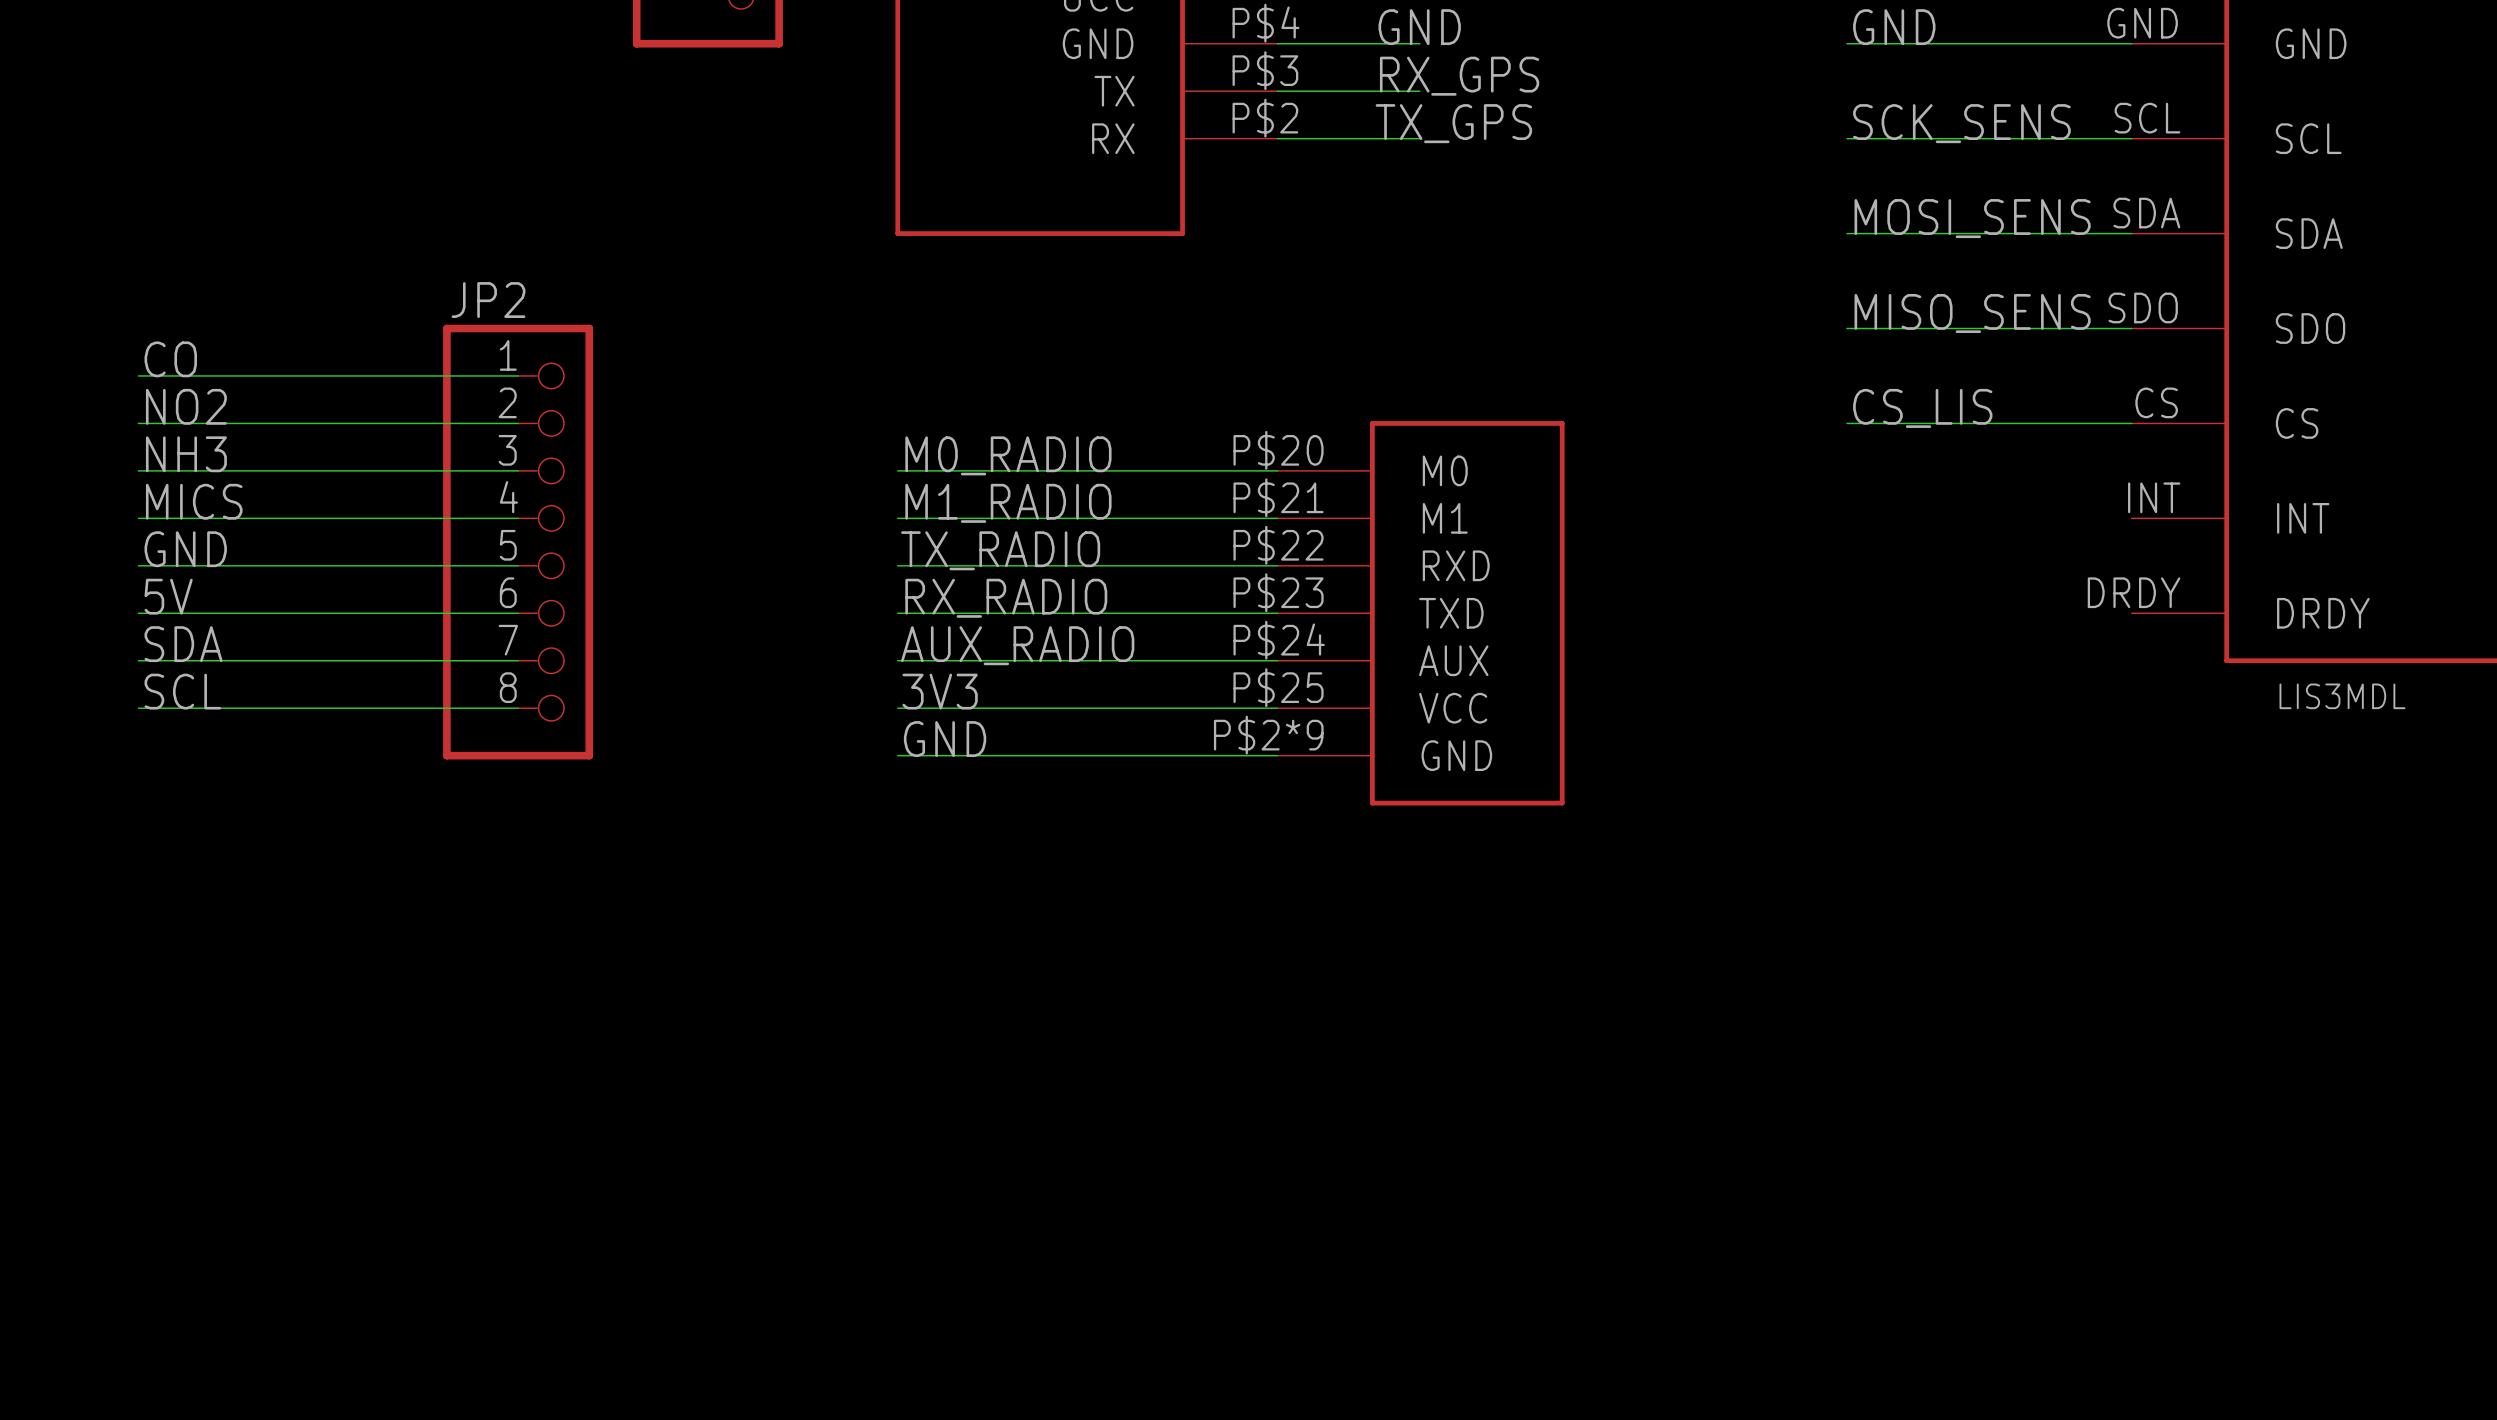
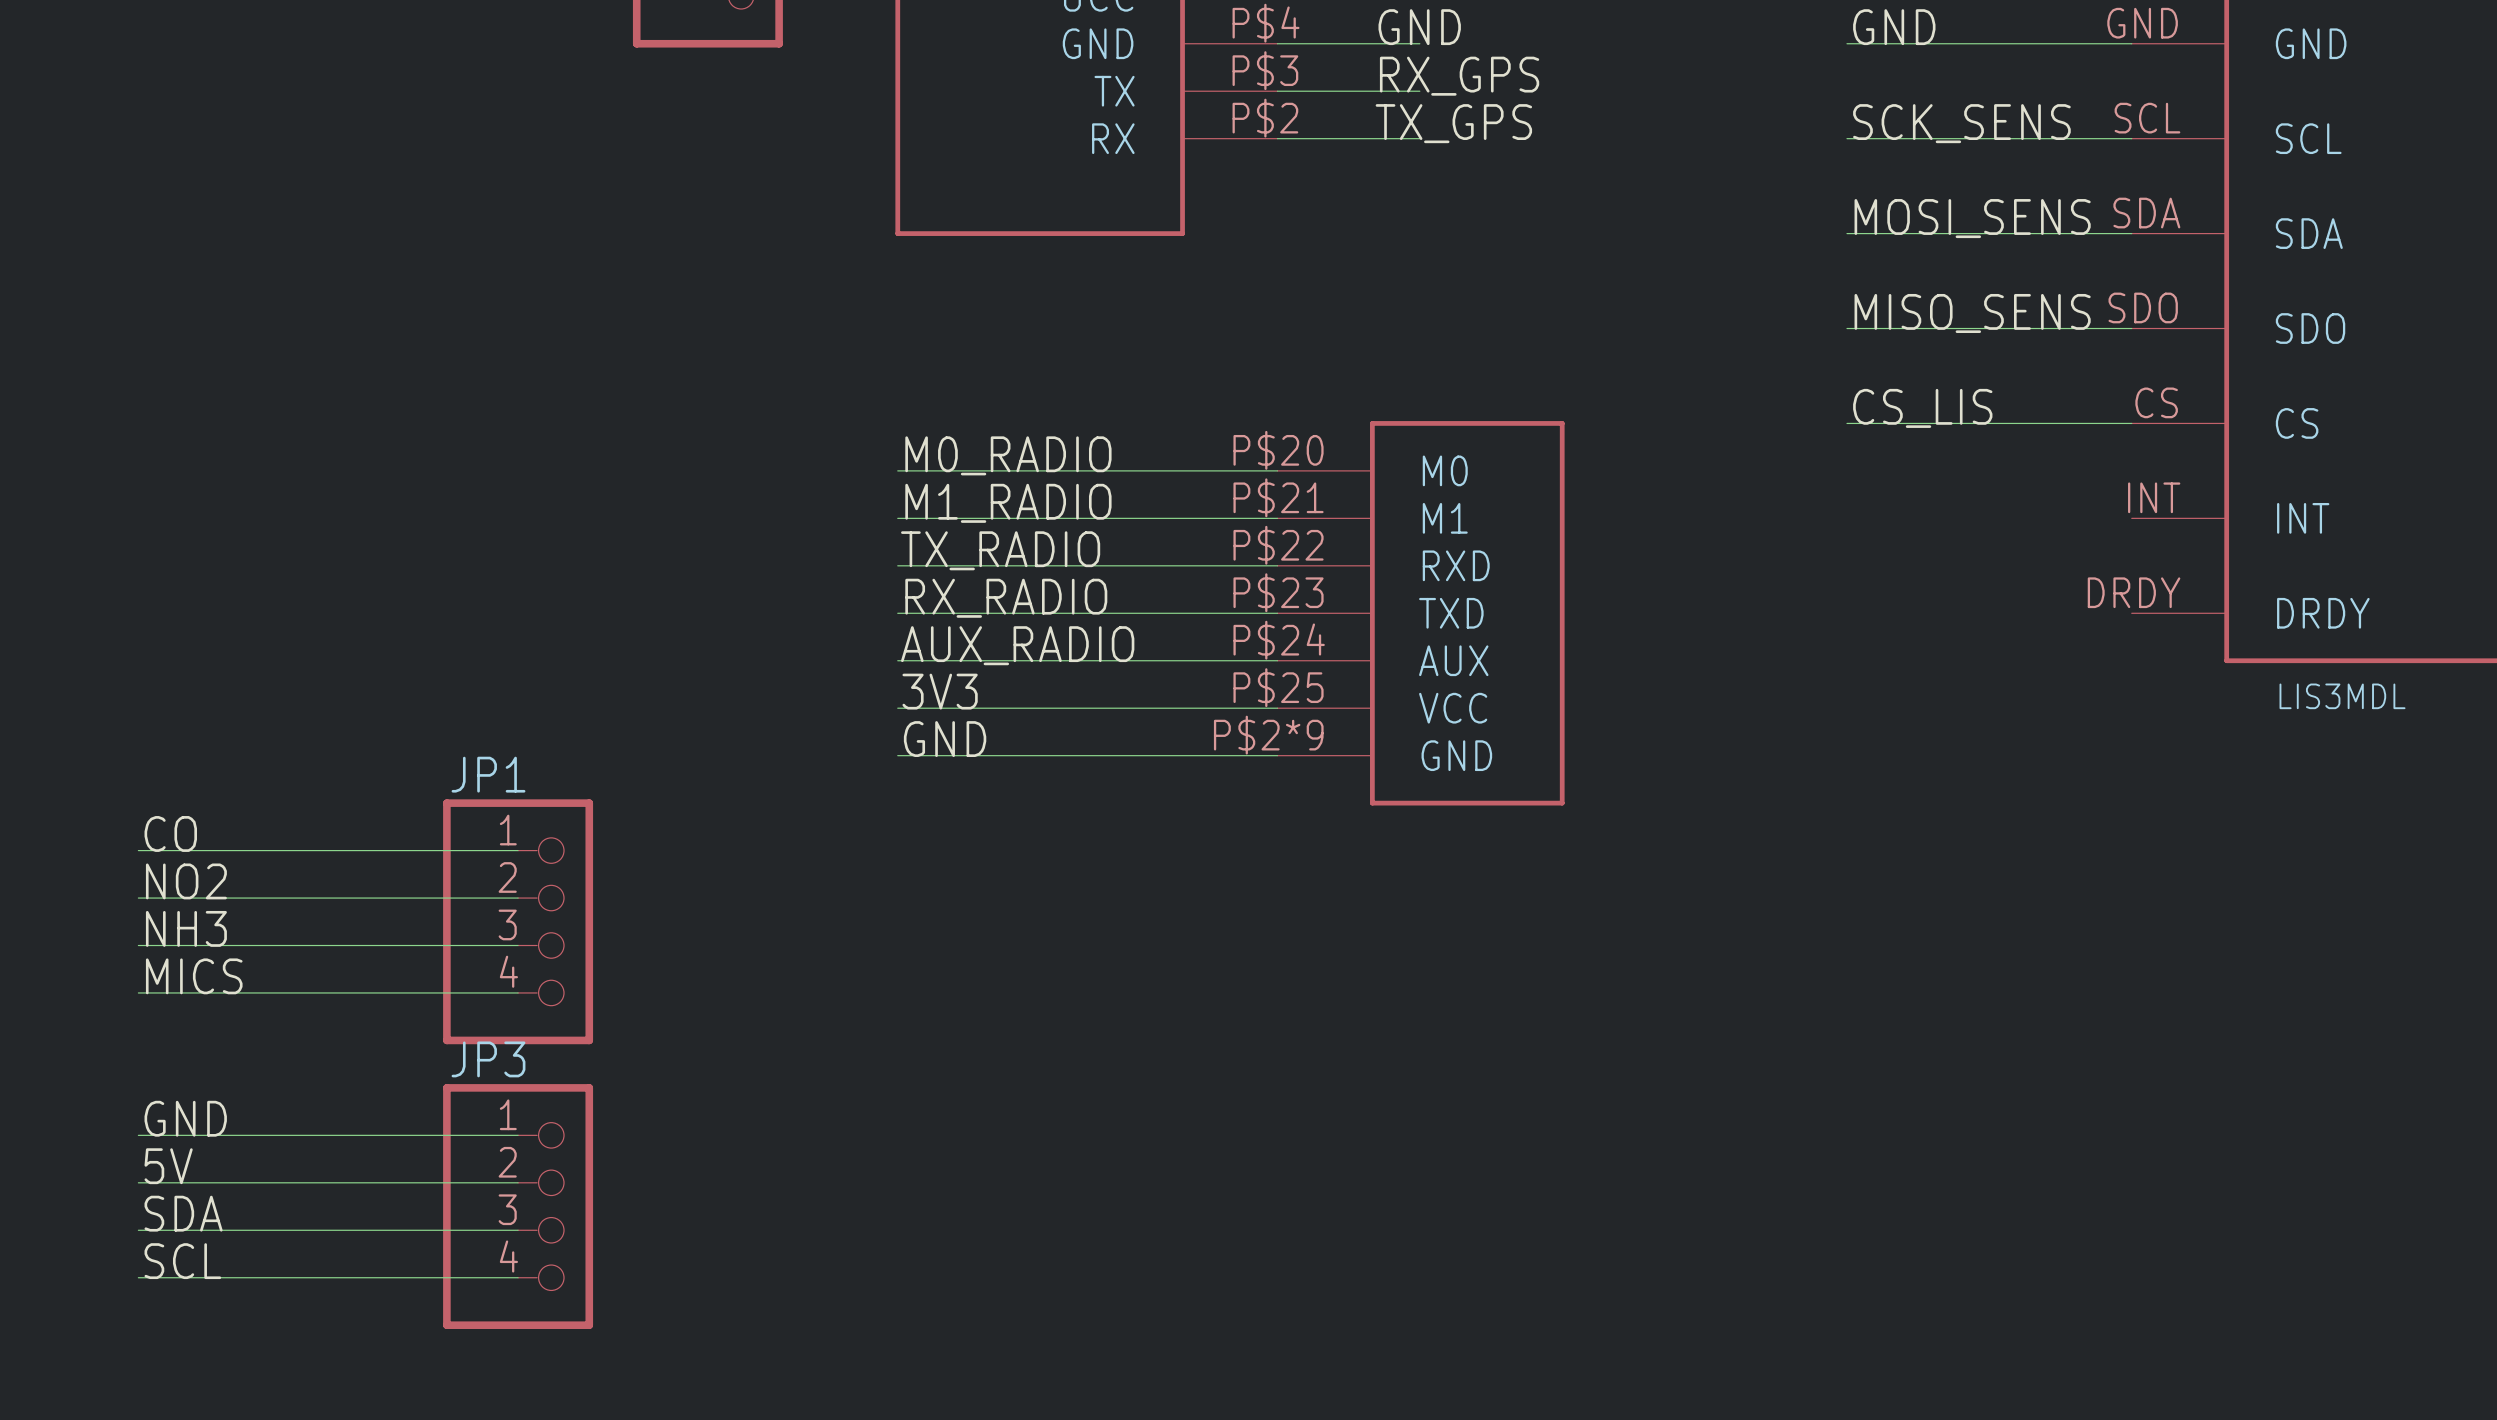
label: CO (170, 359) -> none
wire: (138, 375) (518, 375) -> none
label: NO2 (186, 406) -> none
wire: (138, 423) (518, 423) -> (138, 850) (518, 850)
label: NH3 (186, 454) -> none
wire: (138, 470) (518, 470) -> (138, 898) (518, 898)
label: MICS (194, 501) -> none
wire: (138, 518) (518, 518) -> (138, 945) (518, 945)
JP2: (518, 542) -> none
label: GND (185, 549) -> none
wire: (138, 565) (518, 565) -> (138, 992) (518, 992)
label: 5V (168, 596) -> none
wire: (138, 613) (518, 613) -> none
label: SDA (183, 644) -> none
wire: (138, 660) (518, 660) -> none
label: SCL (182, 691) -> none
wire: (138, 708) (518, 708) -> (138, 1135) (518, 1135)
label: none -> CO (170, 833)
label: none -> NO2 (186, 881)
JP1: none -> (518, 921)
label: none -> NH3 (186, 928)
label: none -> MICS (194, 976)
label: none -> GND (185, 1118)
label: none -> 5V (168, 1166)
wire: none -> (138, 1182) (518, 1182)
JP3: none -> (518, 1206)
label: none -> SDA (183, 1213)
wire: none -> (138, 1230) (518, 1230)
label: none -> SCL (182, 1261)
wire: none -> (138, 1277) (518, 1277)

